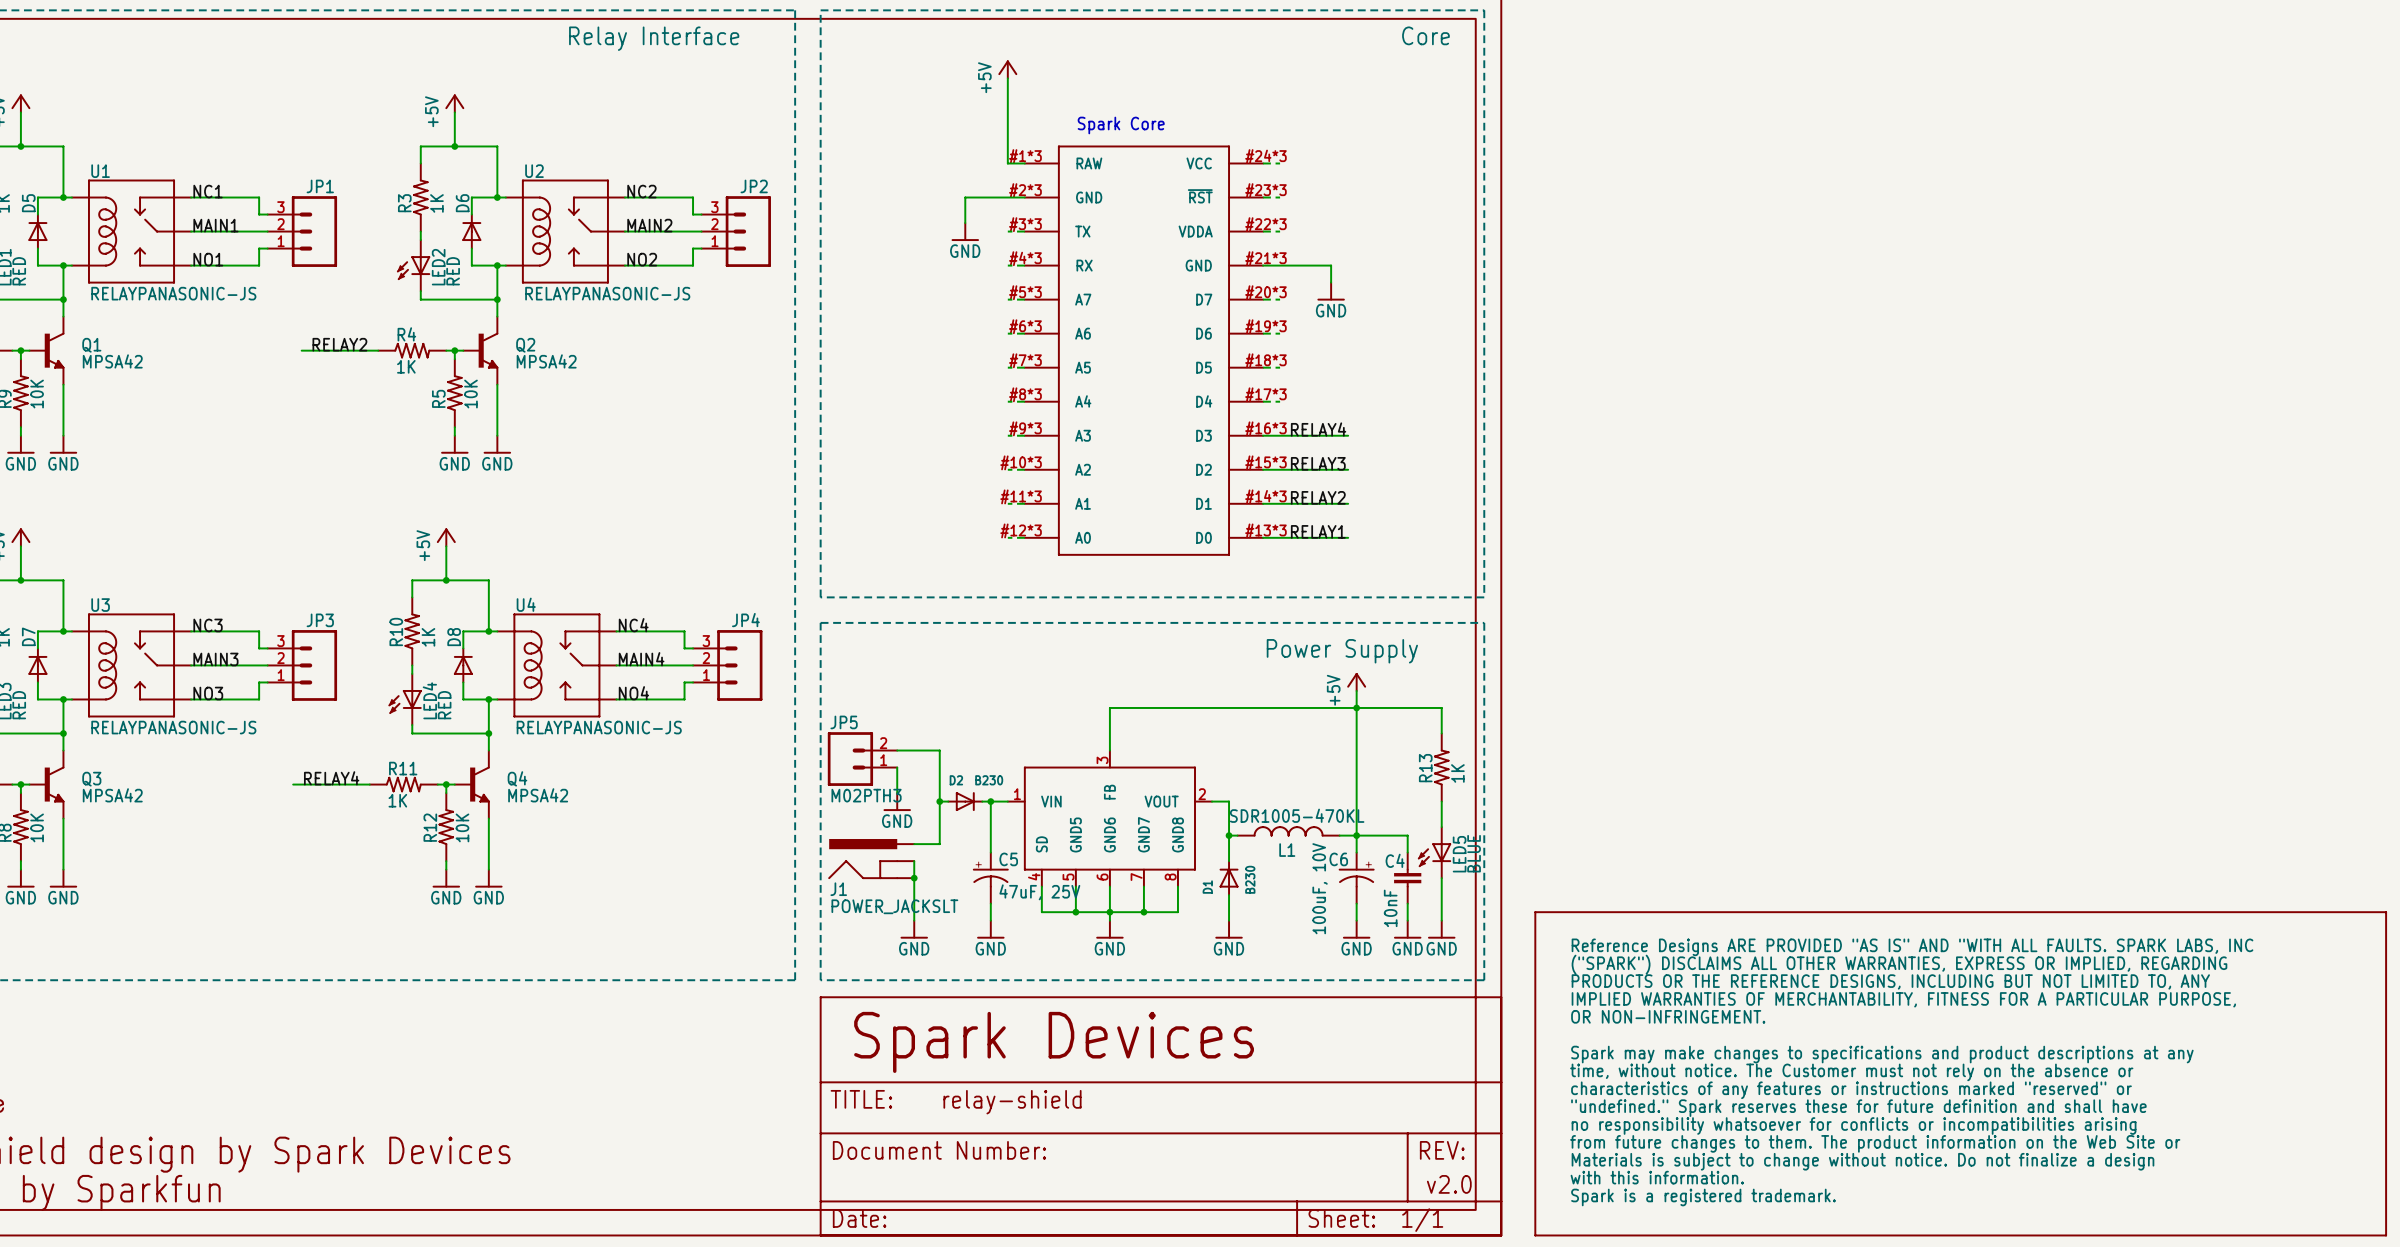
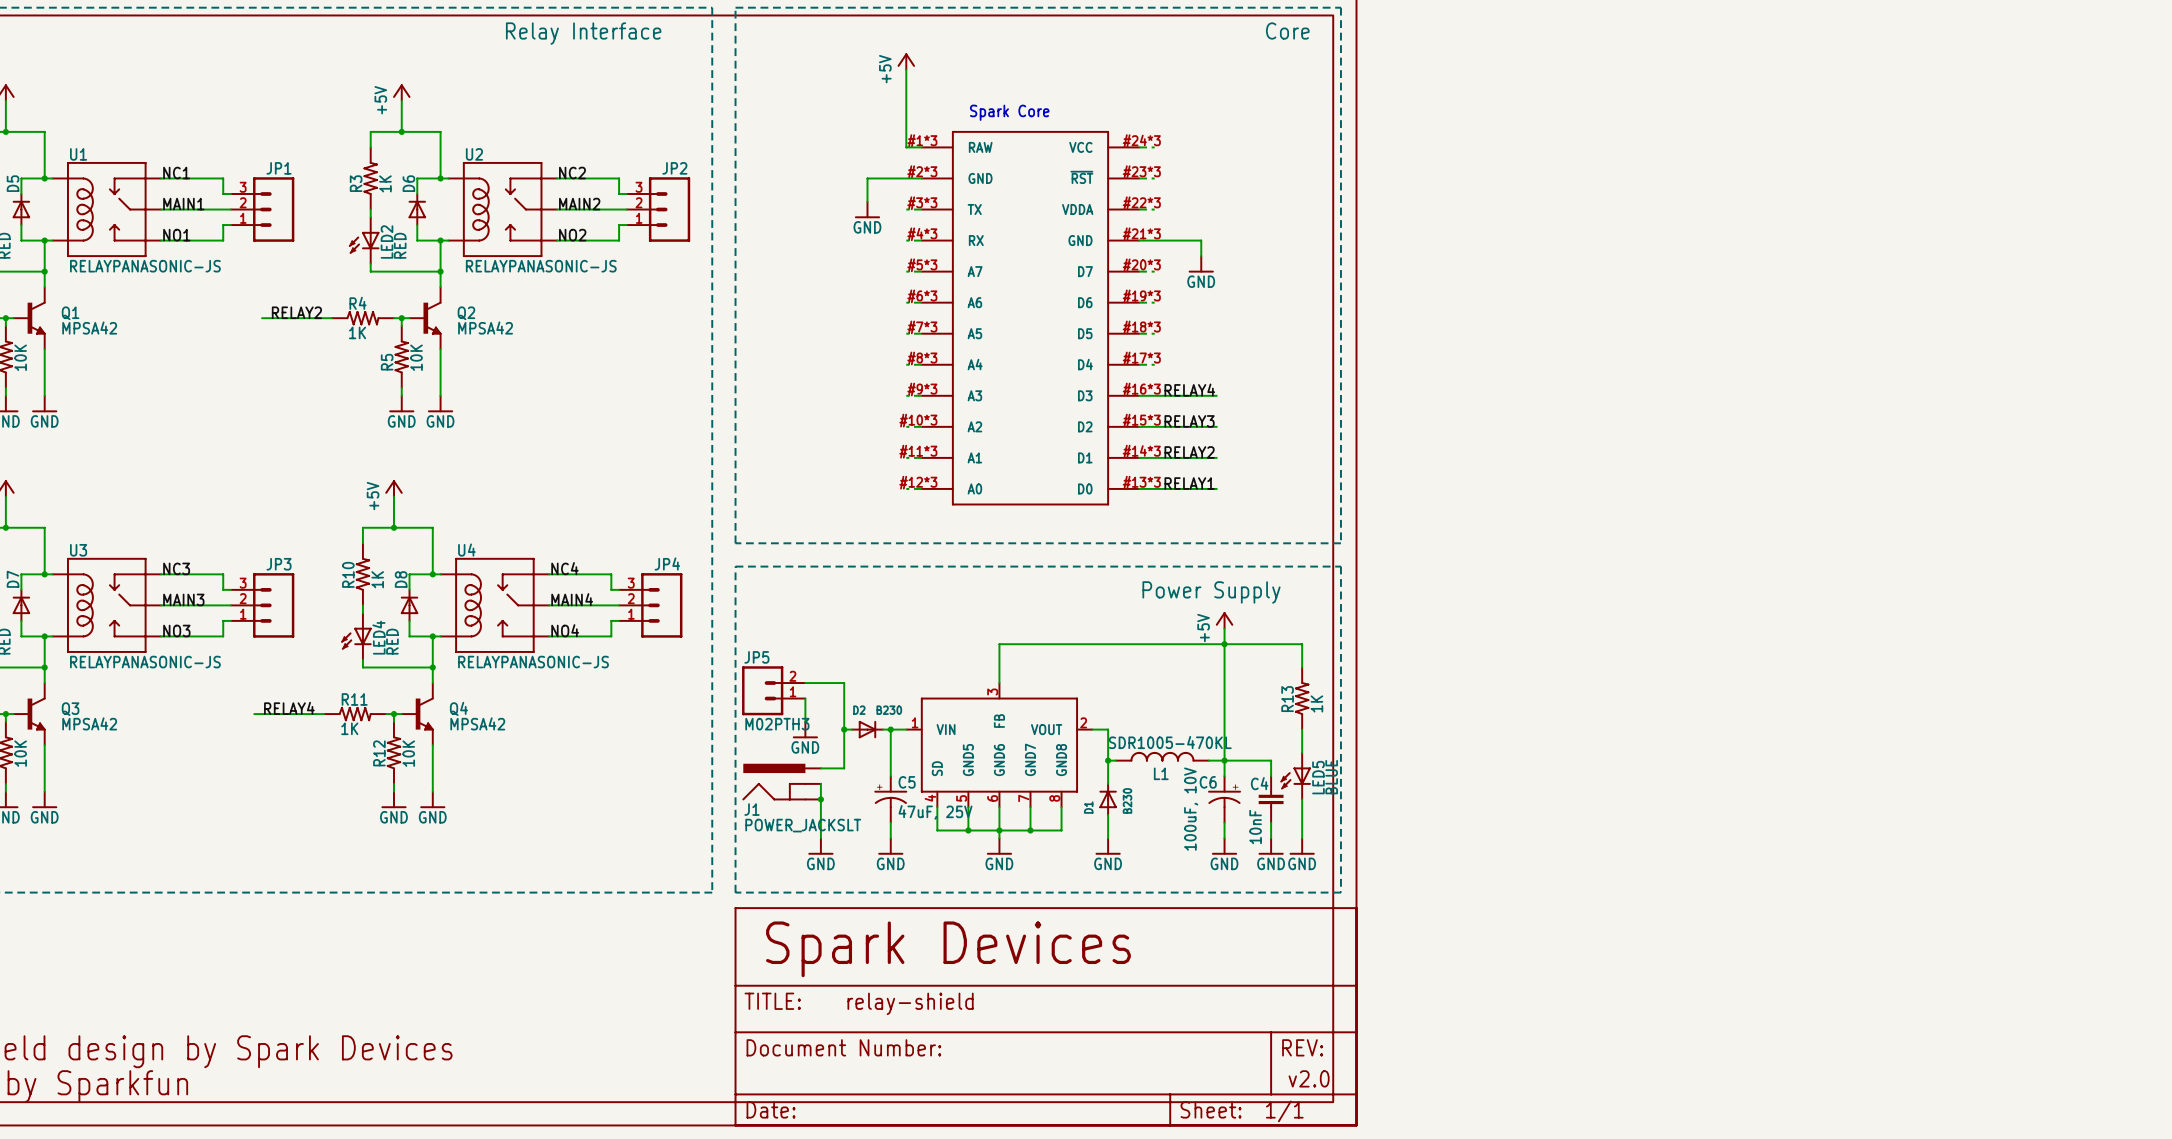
line: (1535, 912) (1535, 1235) (2386, 1235) (2386, 912) (1535, 912) -> none
text: Reference Designs ARE PROVIDED "AS IS" AND "WITH ALL FAULTS. SPARK LABS, INC (1912, 947) -> none
text: ("SPARK") DISCLAIMS ALL OTHER WARRANTIES, EXPRESS OR IMPLIED, REGARDING (1899, 964) -> none
text: PRODUCTS OR THE REFERENCE DESIGNS, INCLUDING BUT NOT LIMITED TO, ANY (1890, 981) -> none
text: IMPLIED WARRANTIES OF MERCHANTABILITY, FITNESS FOR A PARTICULAR PURPOSE, (1903, 999) -> none
text: OR NON-INFRINGEMENT. (1668, 1016) -> none
text: Spark may make changes to specifications and product descriptions at any (1882, 1054) -> none
text: time, without notice. The Customer must not rely on the absence or (1851, 1072) -> none
text: characteristics of any features or instructions marked "reserved" or (1851, 1090) -> none
text: "undefined." Spark reserves these for future definition and shall have (1858, 1108) -> none
text: no responsibility whatsoever for conflicts or incompatibilities arising (1854, 1126) -> none
text: from future changes to them. The product information on the Web Site or (1875, 1143) -> none
text: Materials is subject to change without notice. Do not finalize a design (1862, 1161) -> none
text: with this information. (1657, 1177) -> none
text: Spark is a registered trademark. (1703, 1197) -> none

